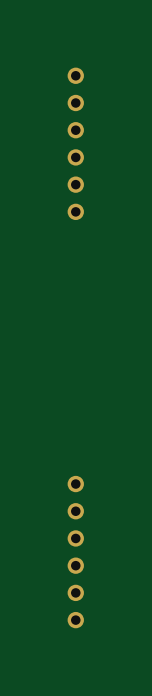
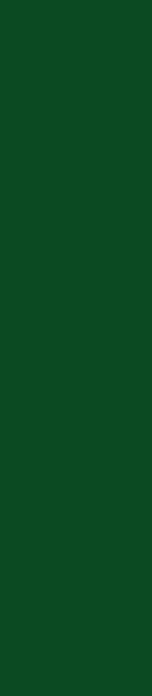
via: (75, 75) -> none
via: (75, 102) -> none
via: (75, 130) -> none
via: (75, 157) -> none
via: (75, 184) -> none
via: (75, 211) -> none
via: (75, 484) -> none
via: (75, 511) -> none
via: (75, 538) -> none
via: (75, 565) -> none
via: (75, 592) -> none
via: (75, 620) -> none

